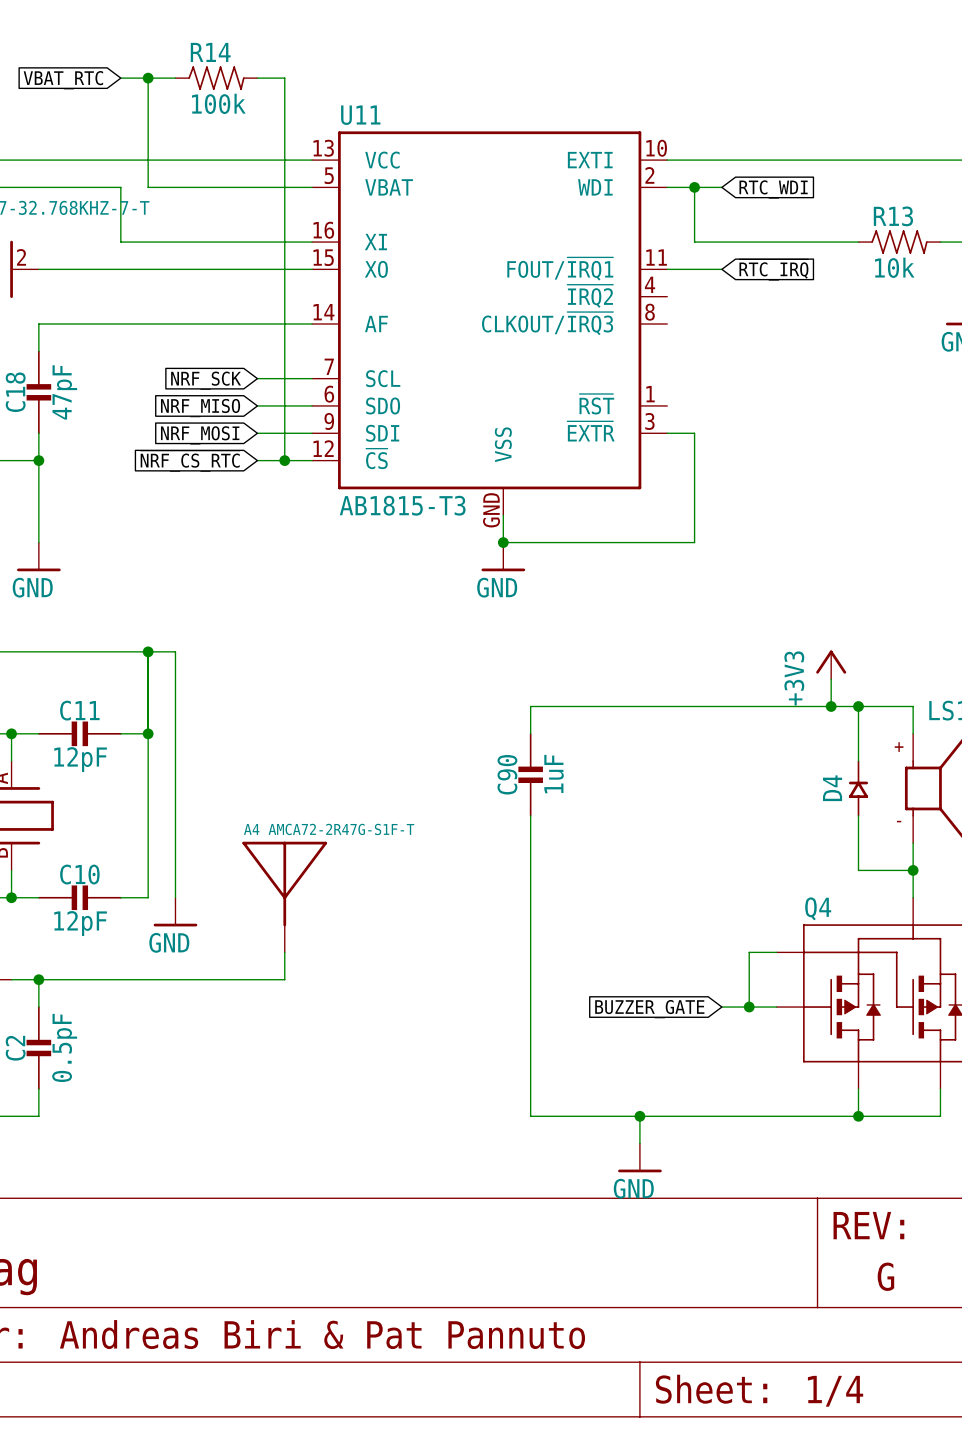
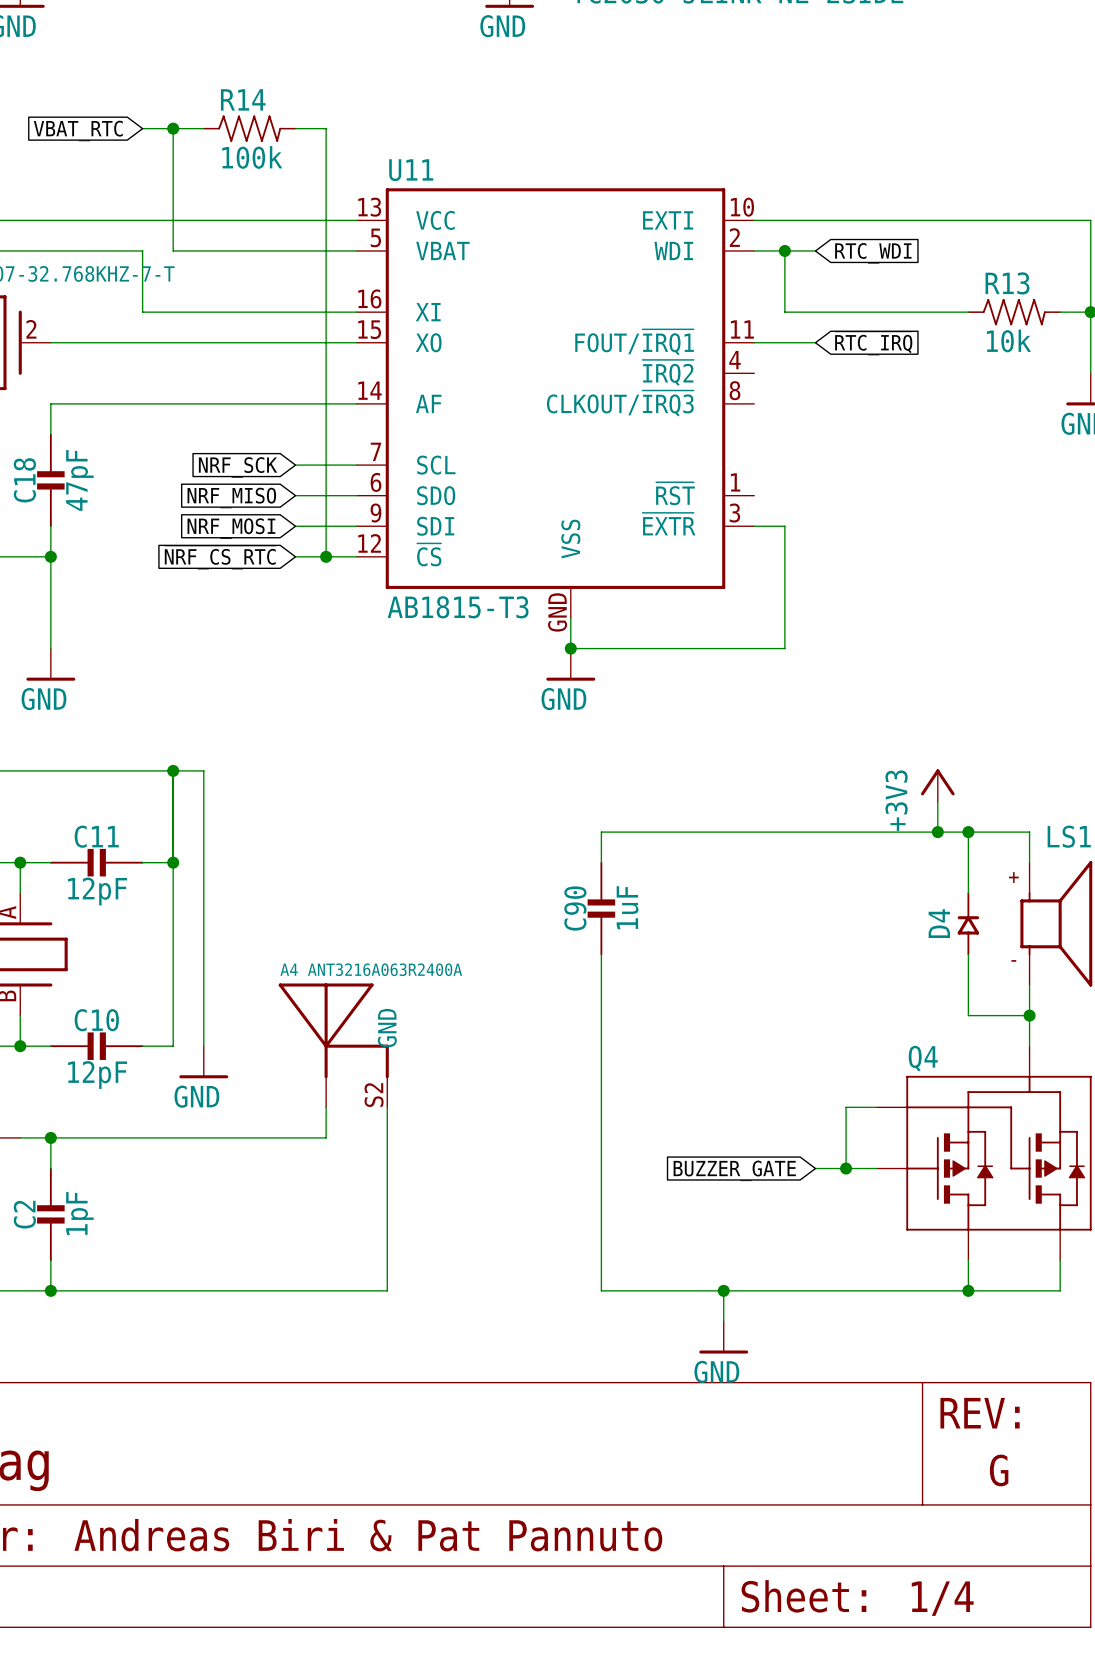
A4 value: AMCA72-2R47G-S1F-T (341, 829) -> ANT3216A063R2400A (385, 969)
A4 symbol: [242, 841, 328, 953] -> [278, 983, 389, 1108]
wire: none -> (387, 1107) (387, 1290) (50, 1290)
C2 value: 0.5pF (64, 1047) -> 1pF (79, 1213)
junction: none -> (50, 1290)

